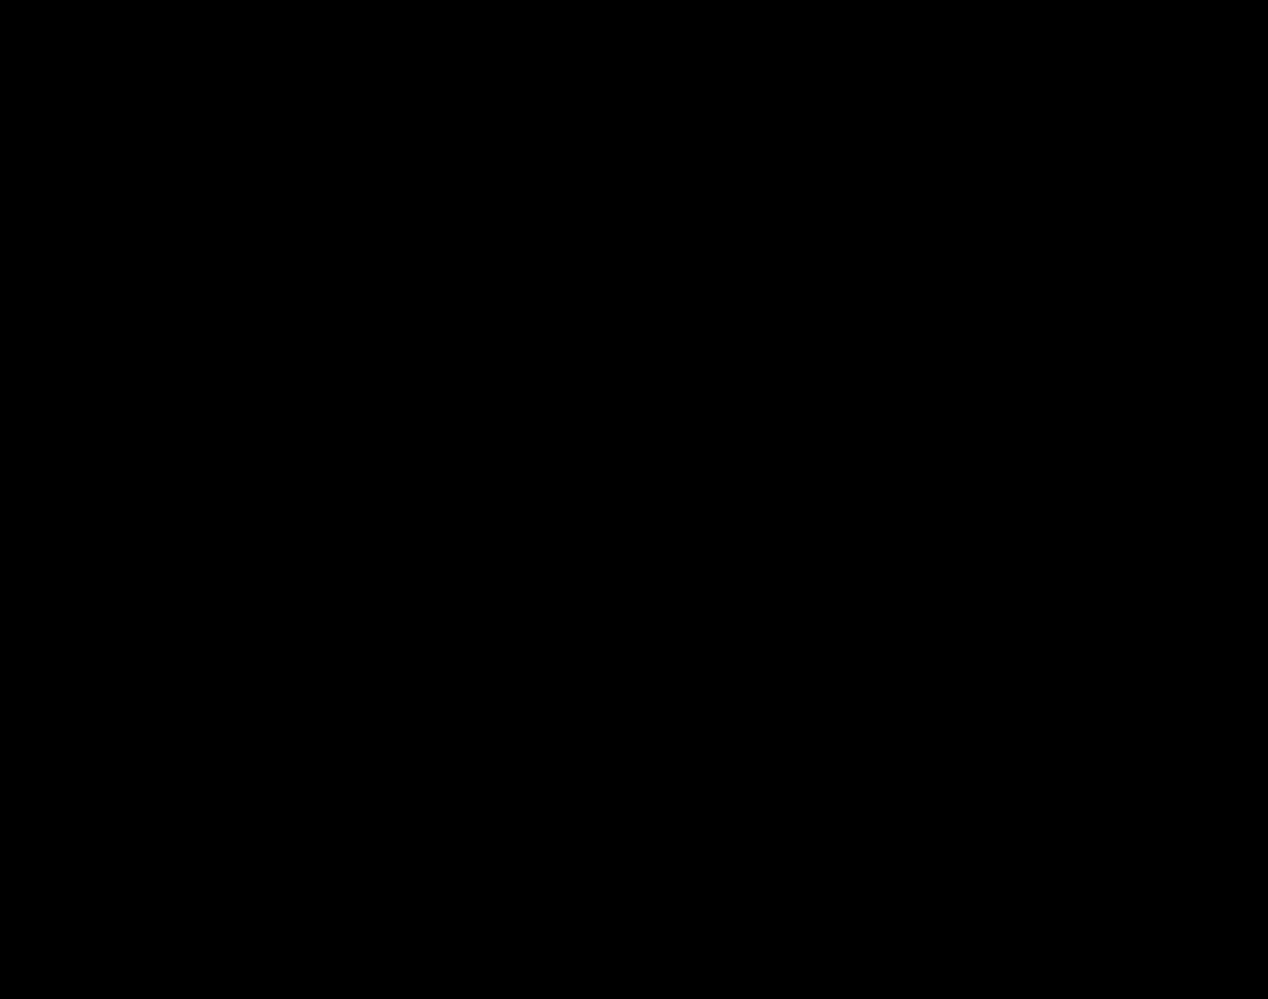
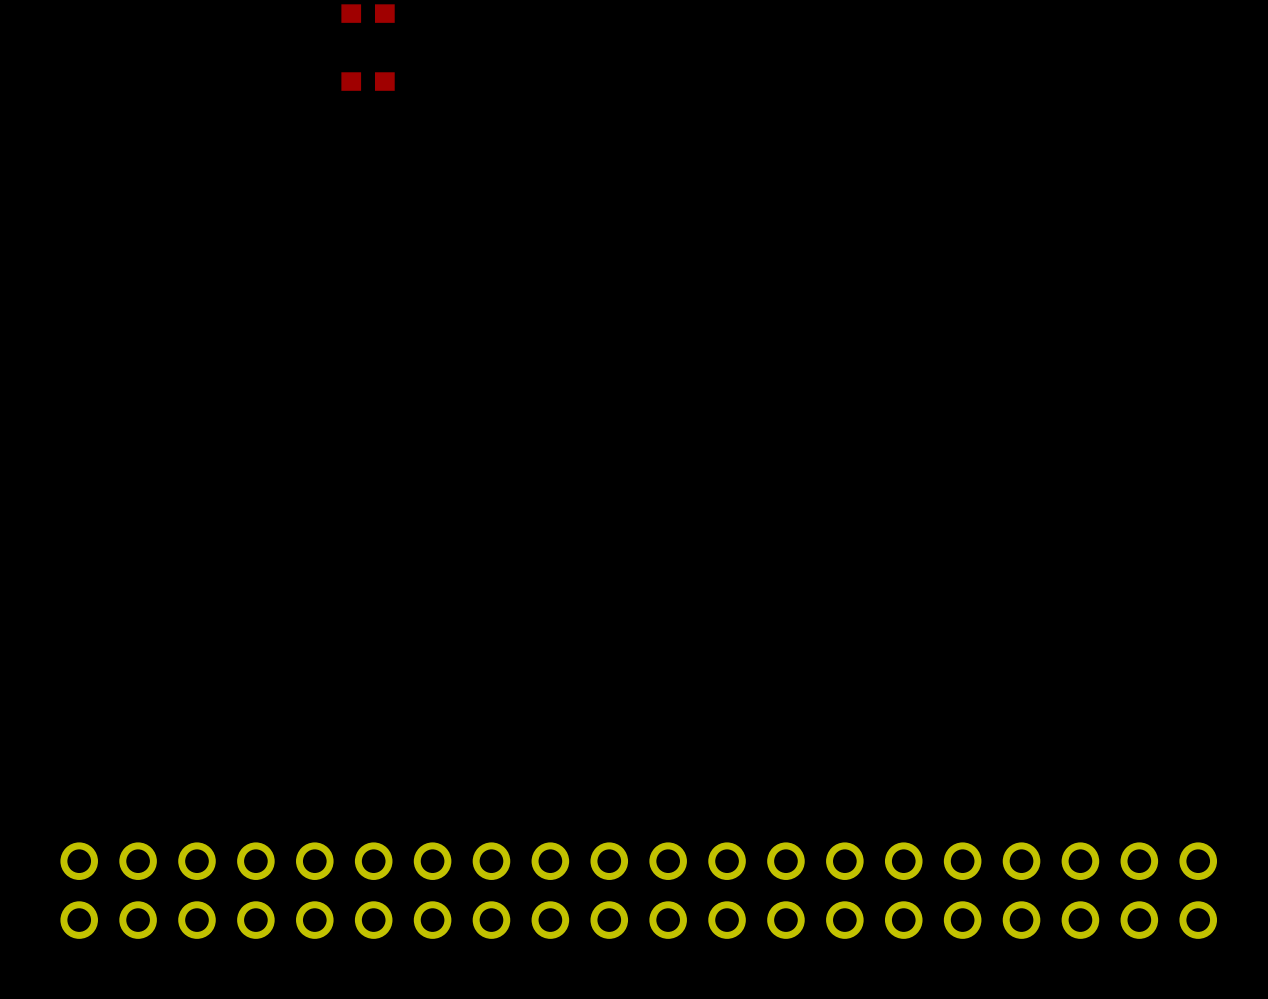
part: none -> (368, 13)
part: none -> (368, 81)
part: none -> (638, 890)

